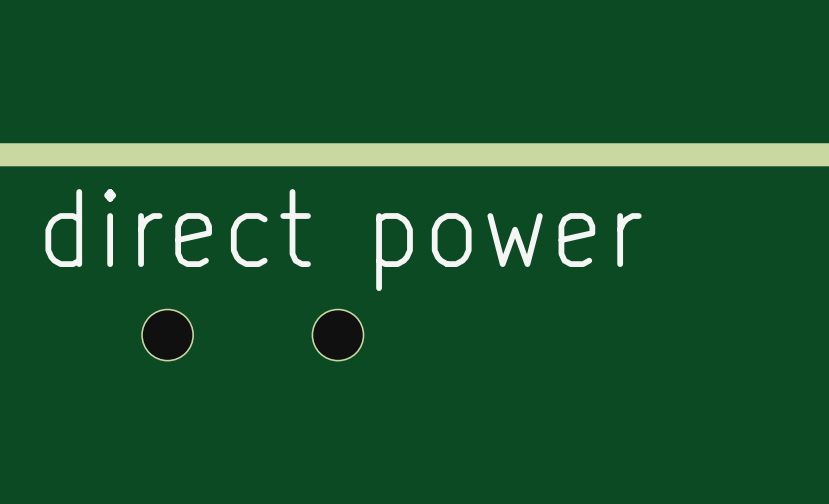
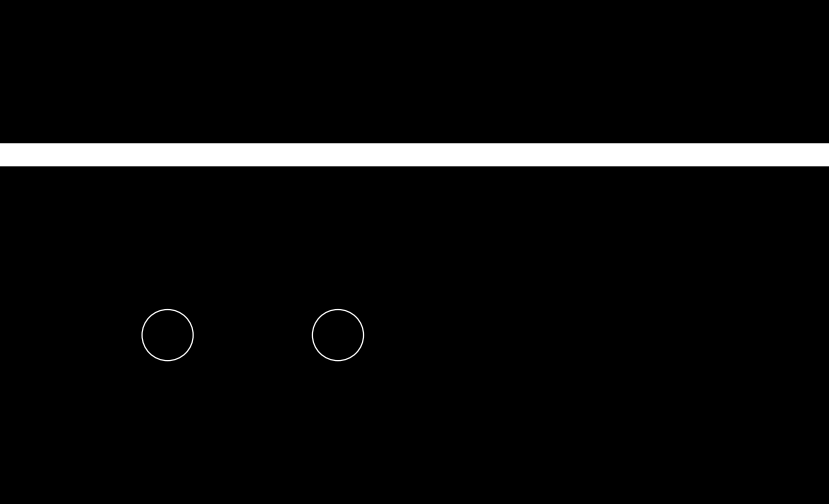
text: direct power (343, 240) -> none

